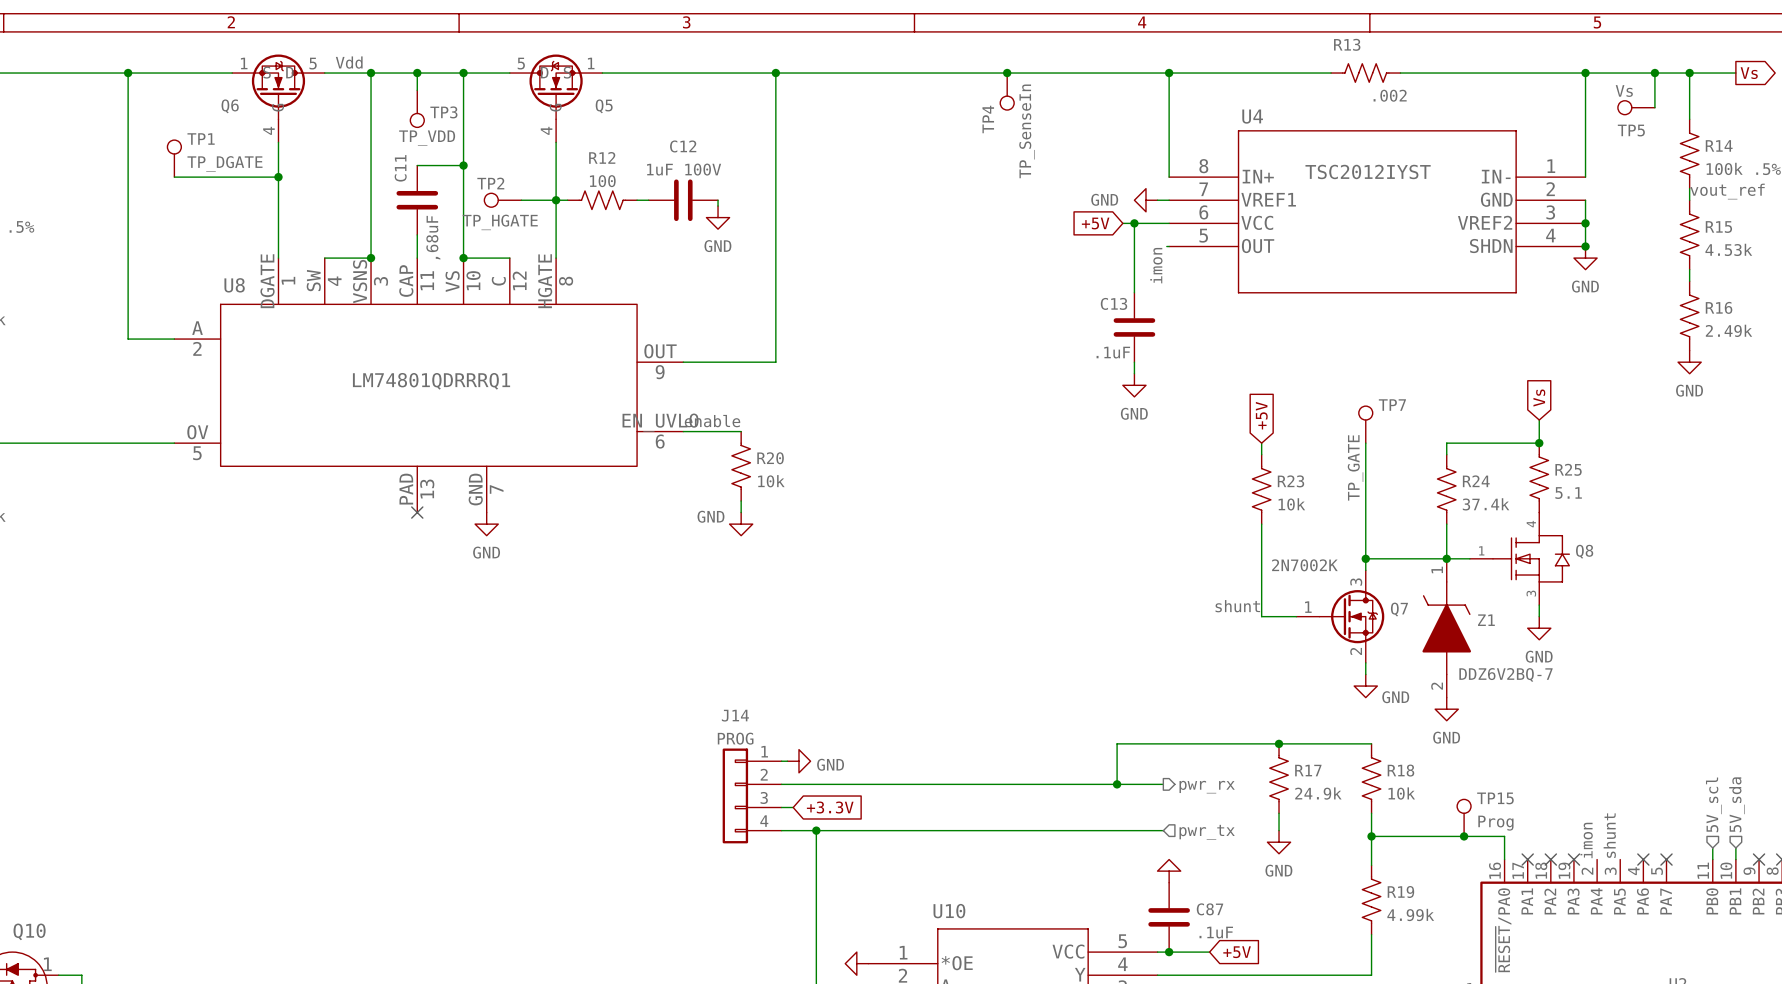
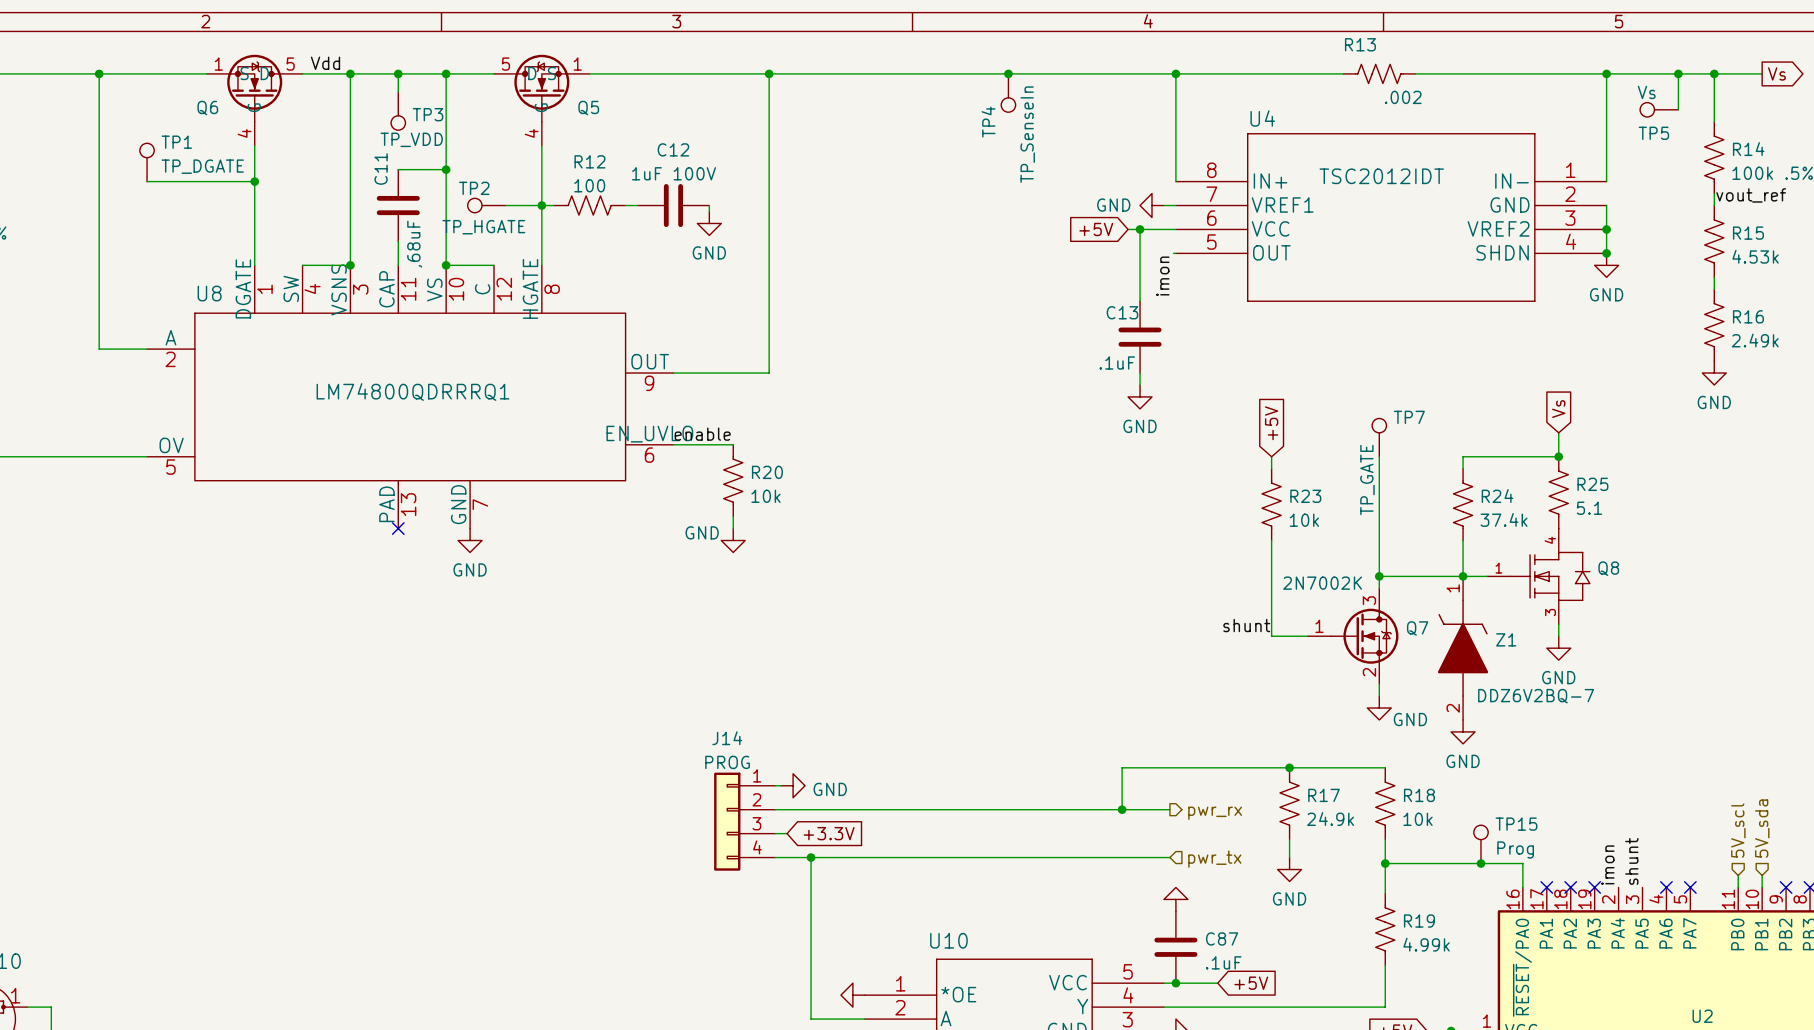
U4 value: TSC2012IYST (1368, 171) -> TSC2012IDT (1381, 176)
U8 value: LM74801QDRRRQ1 (431, 381) -> LM74800QDRRRQ1 (412, 391)

